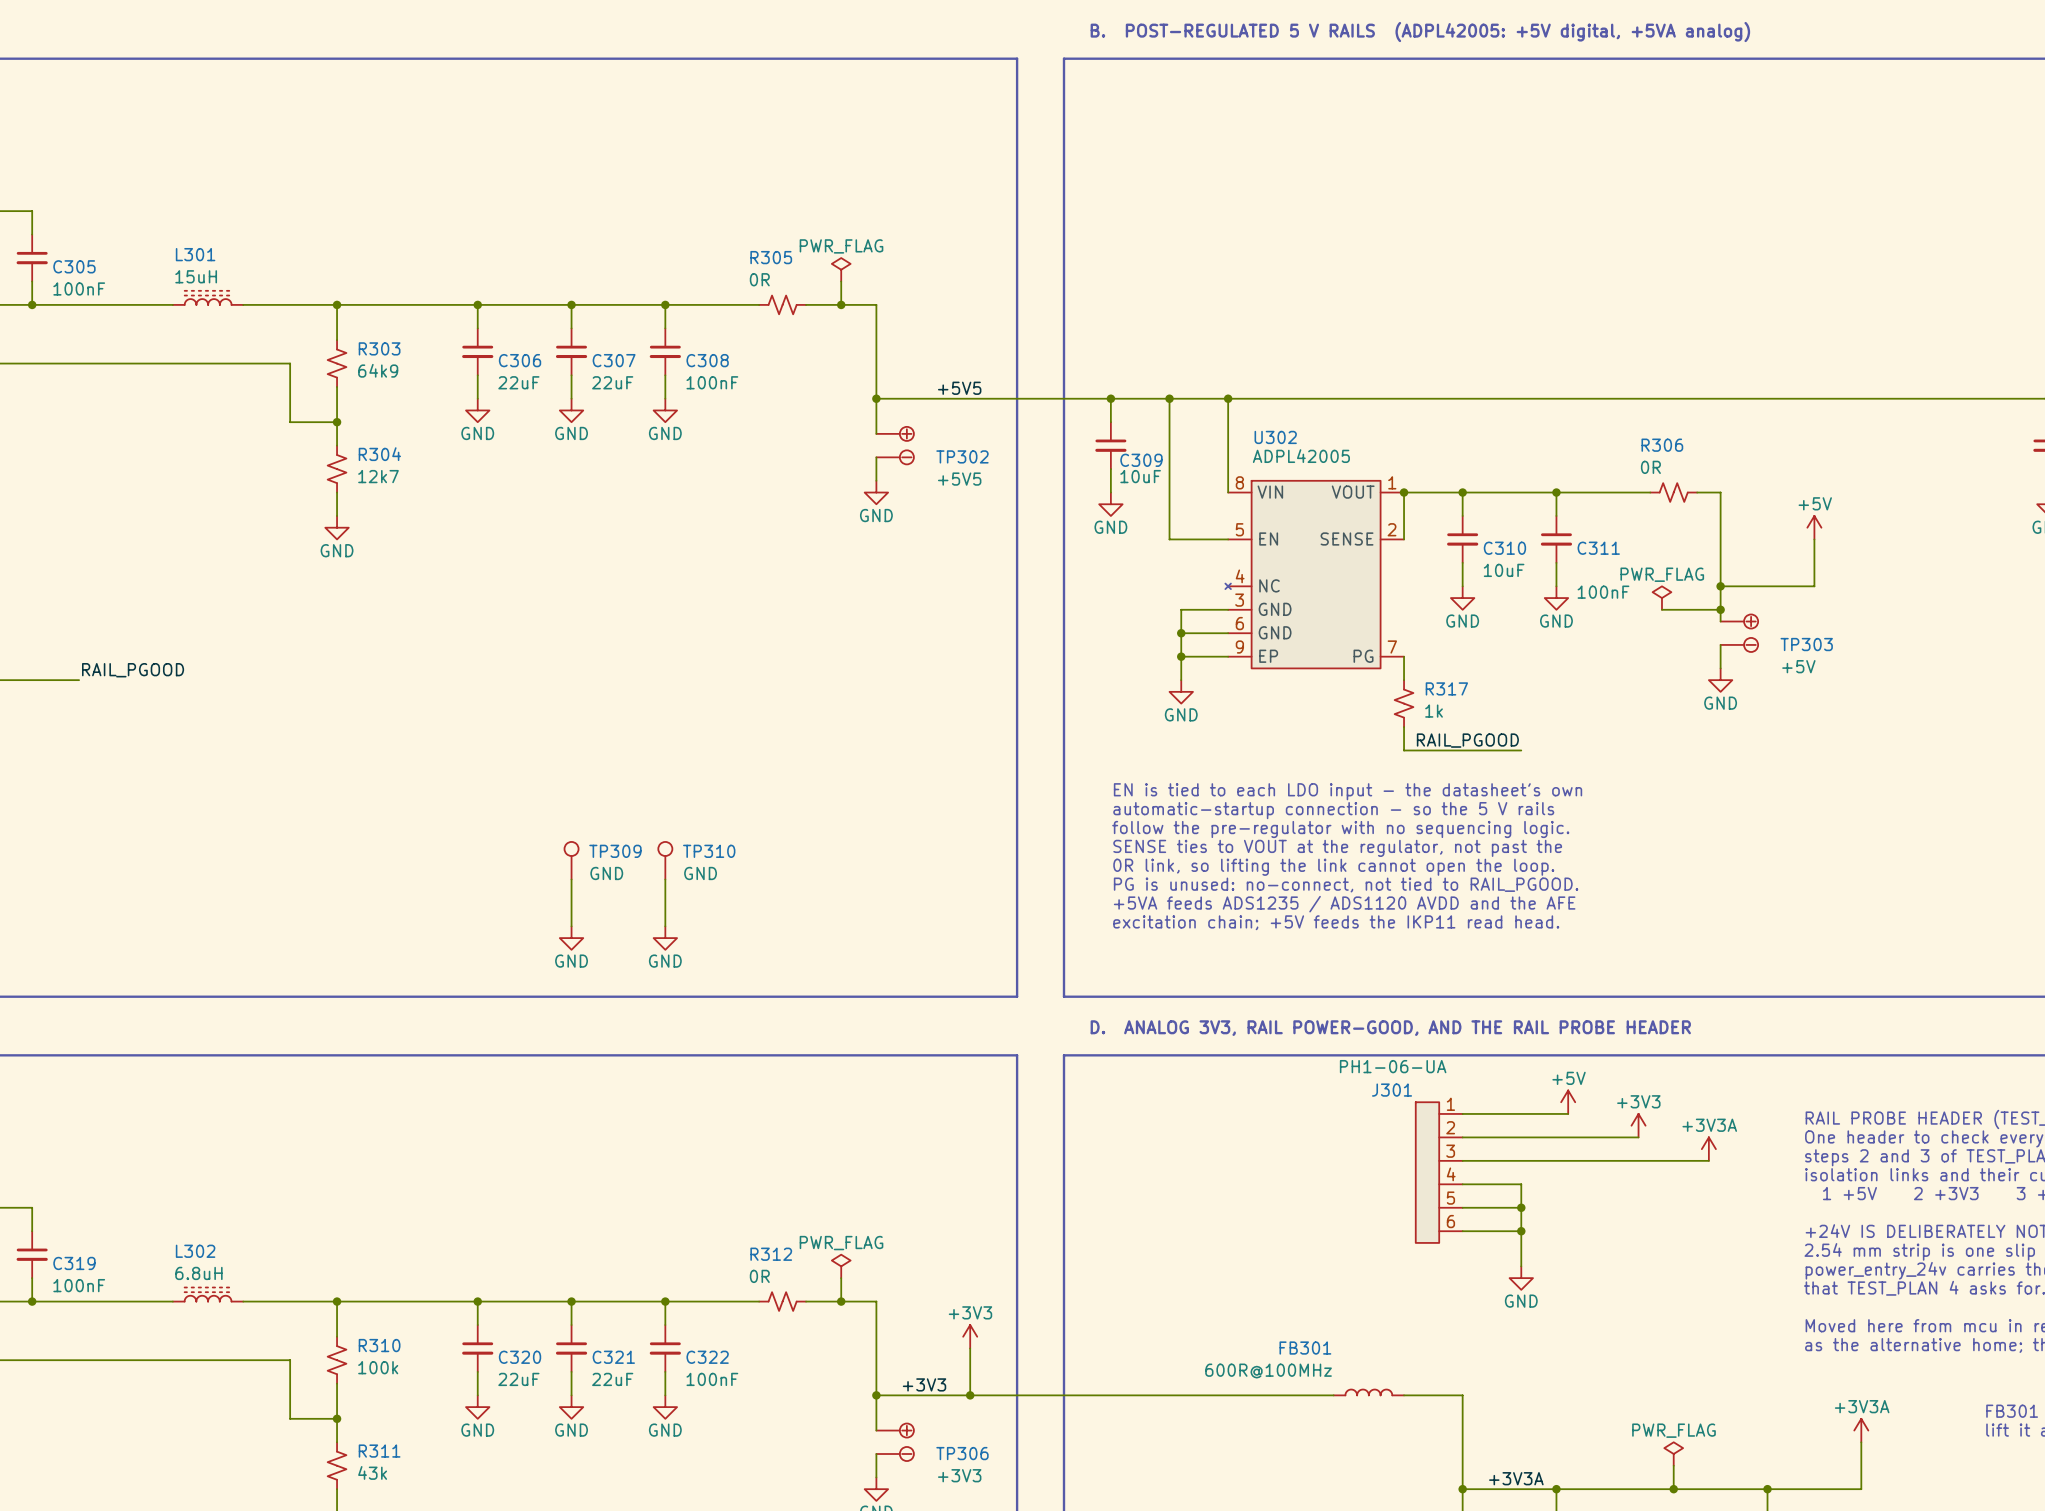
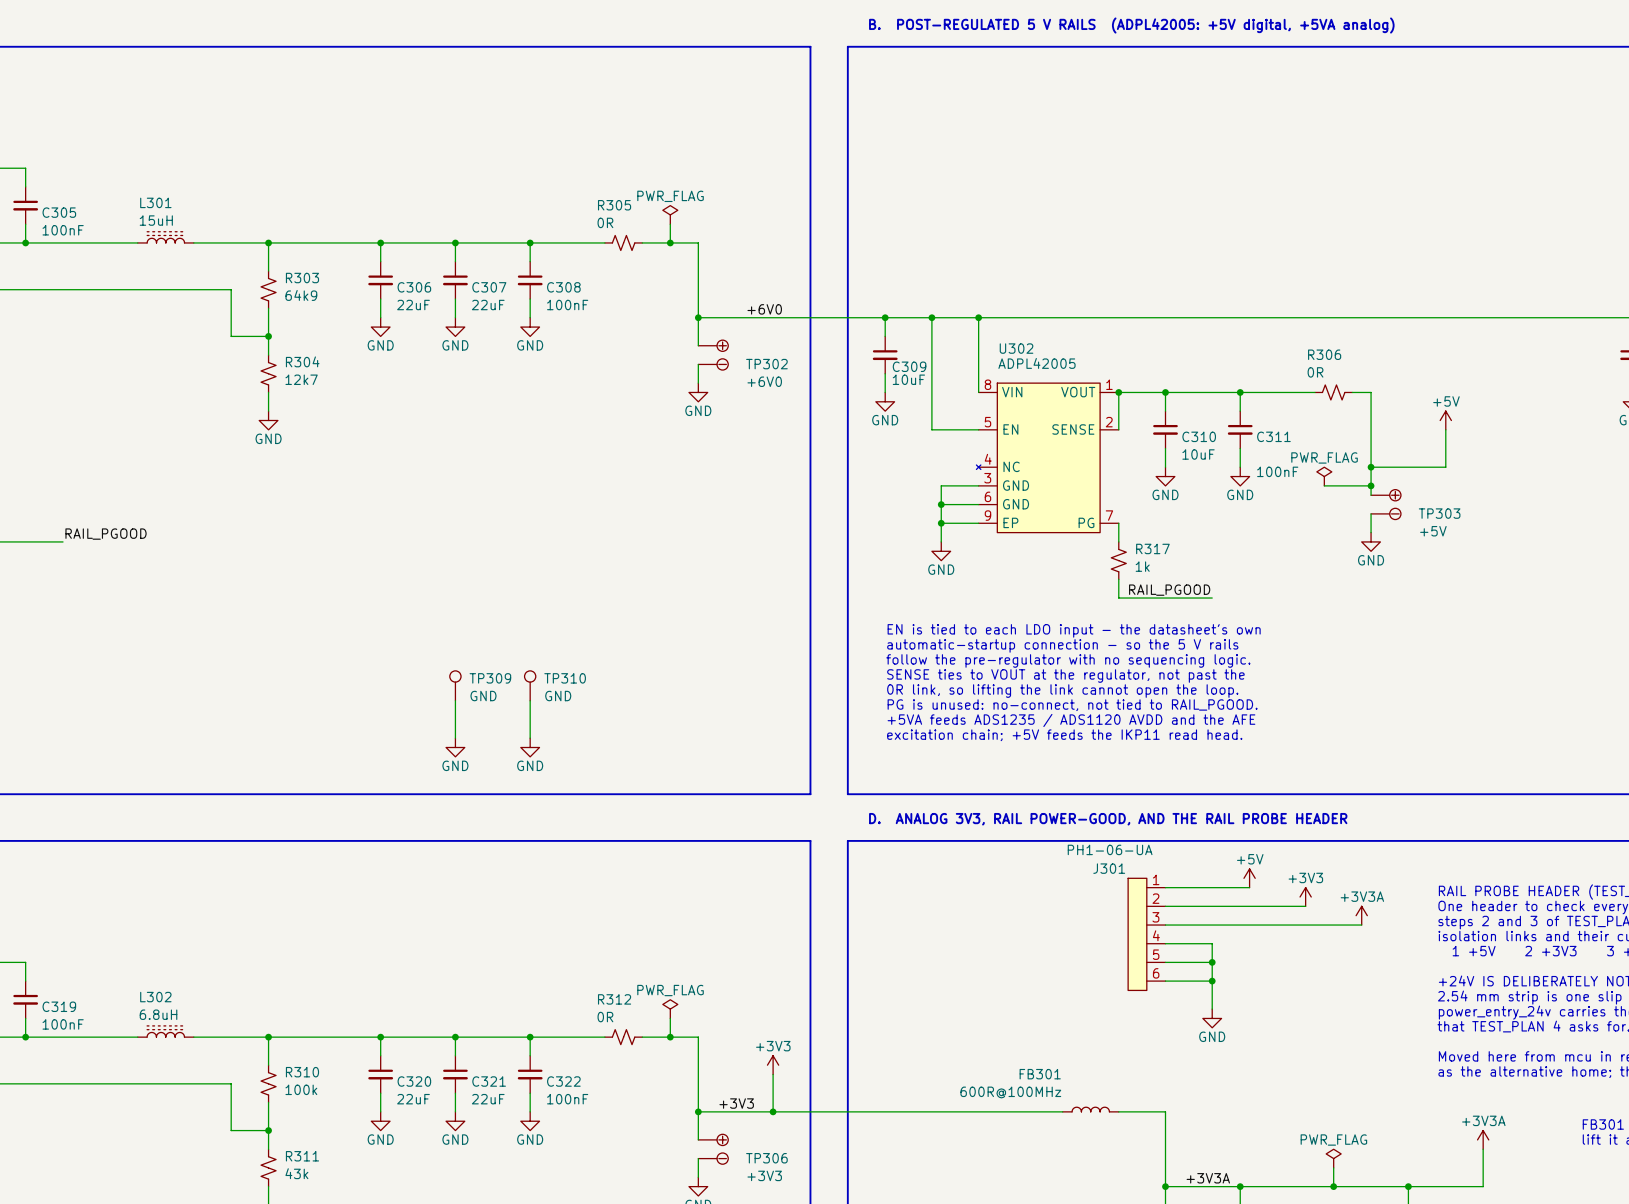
label: +5V5 (959, 388) -> +6V0 (764, 309)
TP302 value: +5V5 (959, 479) -> +6V0 (764, 381)

